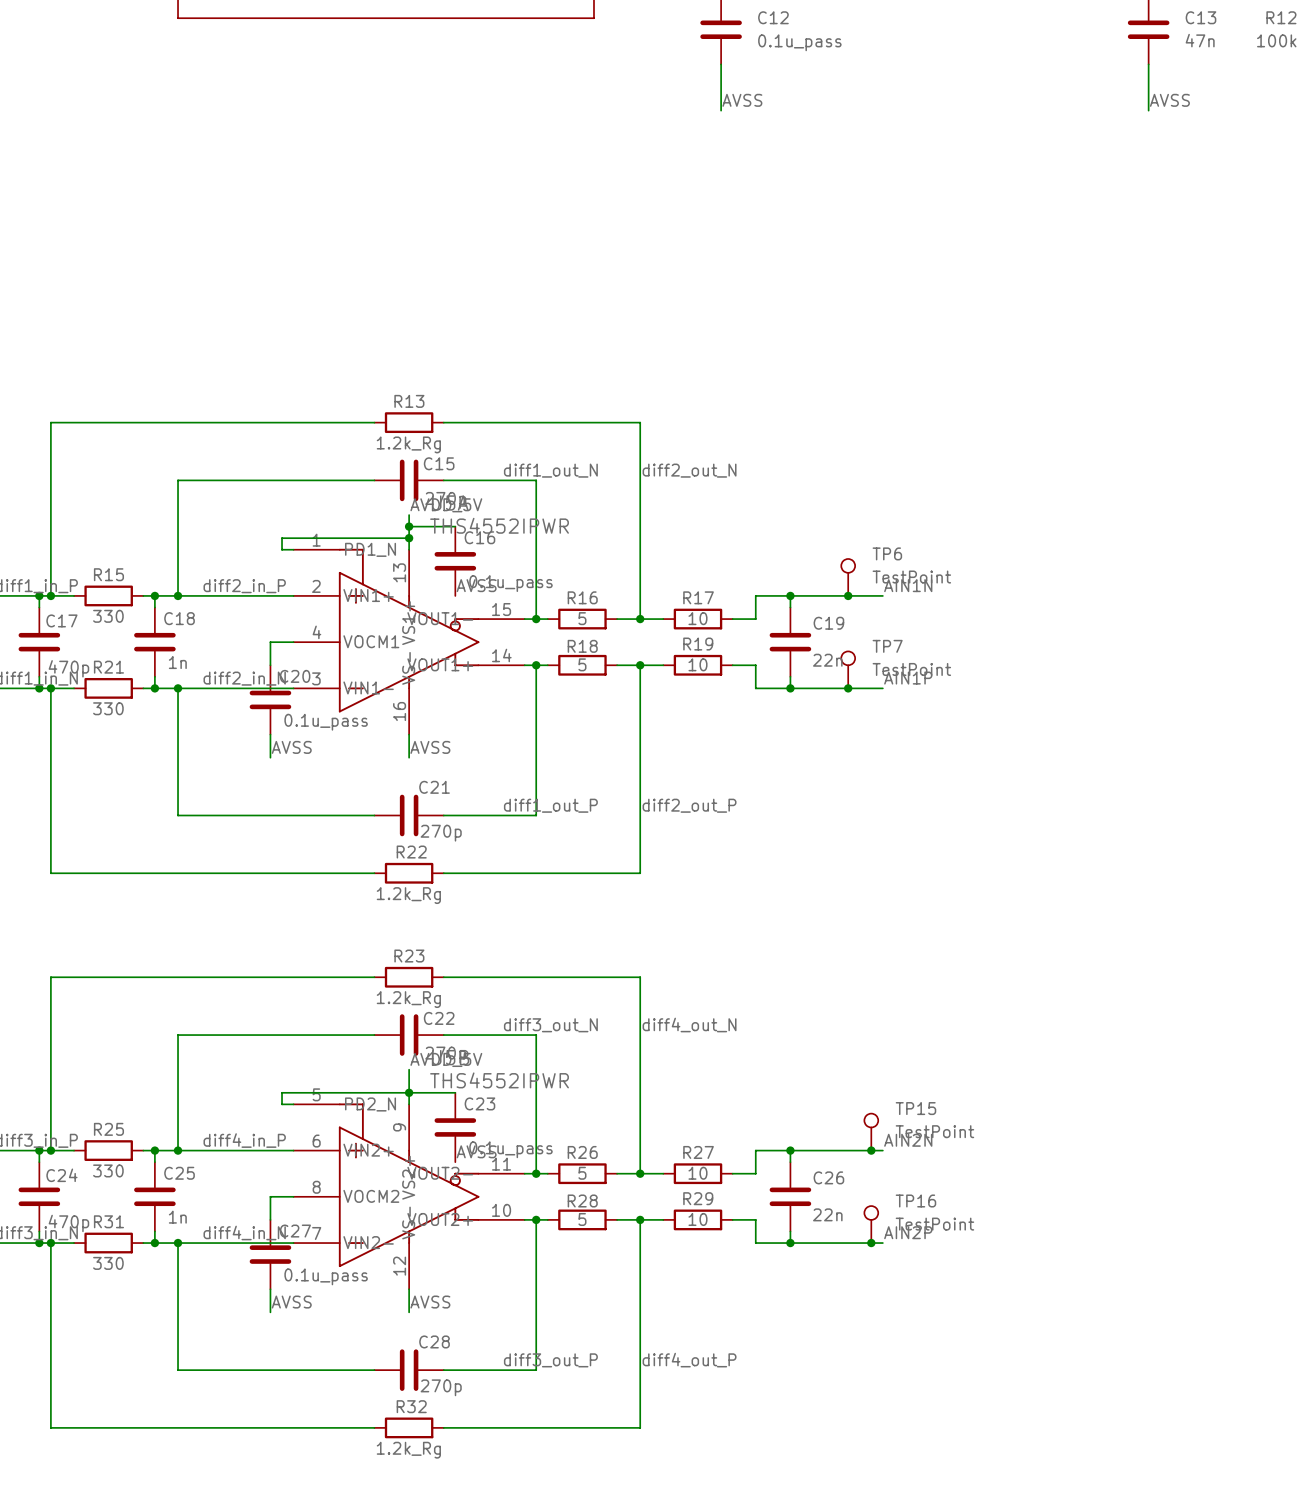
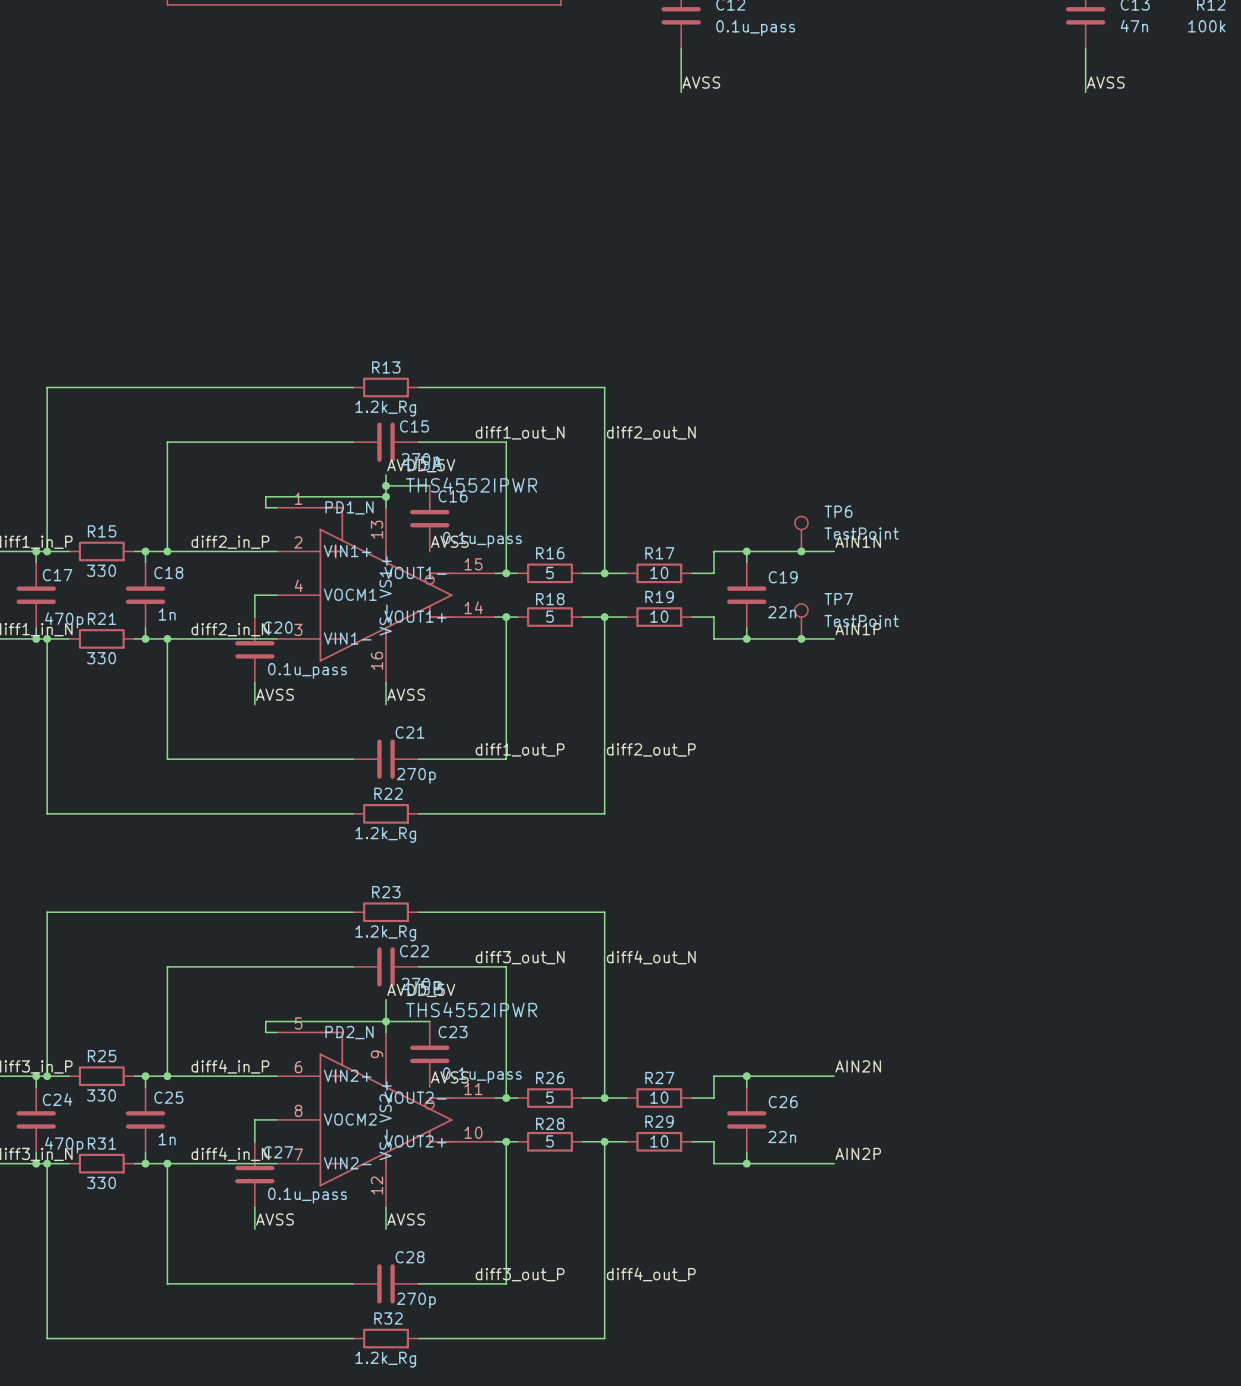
TP15: TestPoint (871, 1132) -> none
junction: (871, 1150) -> none
TP16: TestPoint (871, 1224) -> none
junction: (871, 1243) -> none

